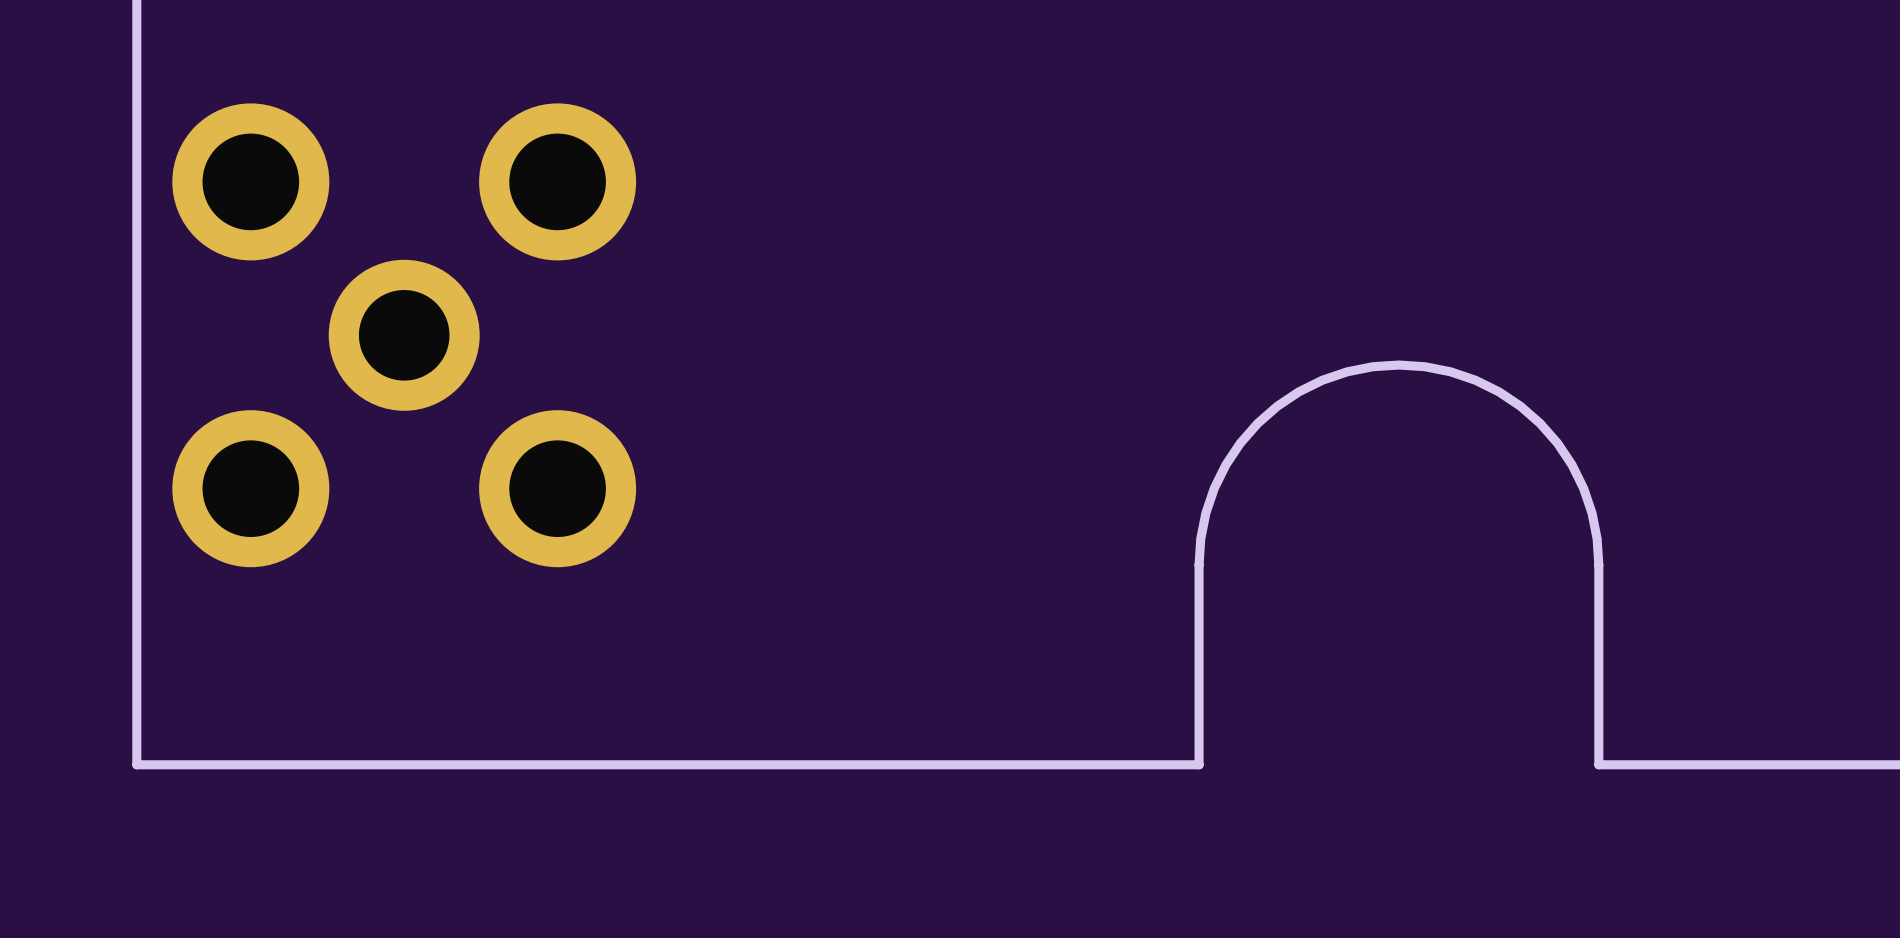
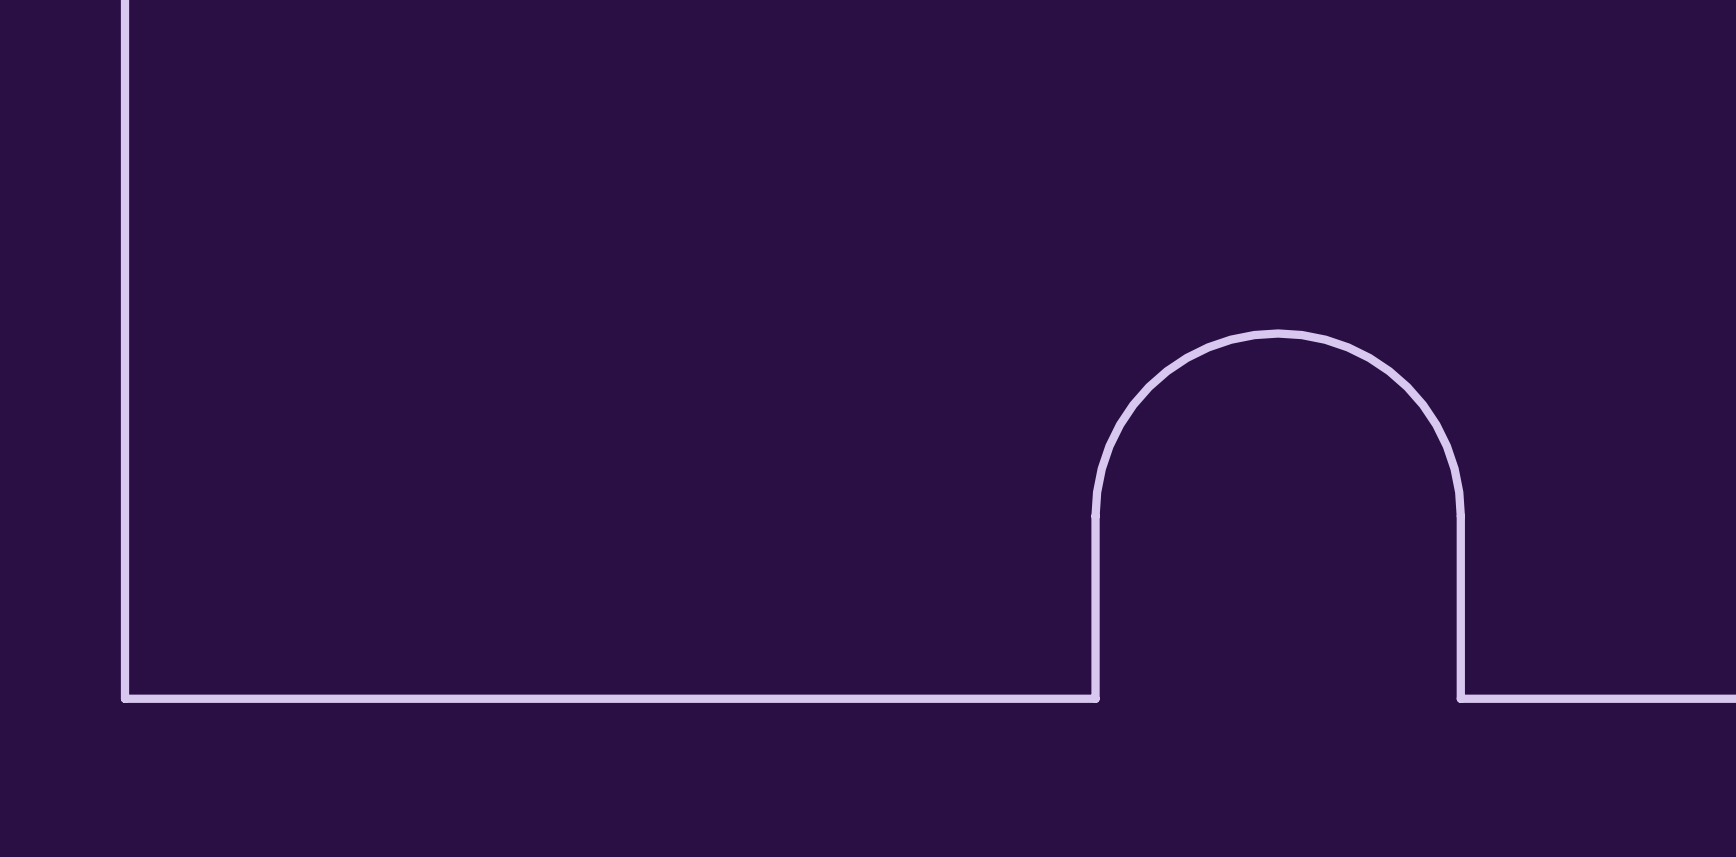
part: (404, 335) -> none

